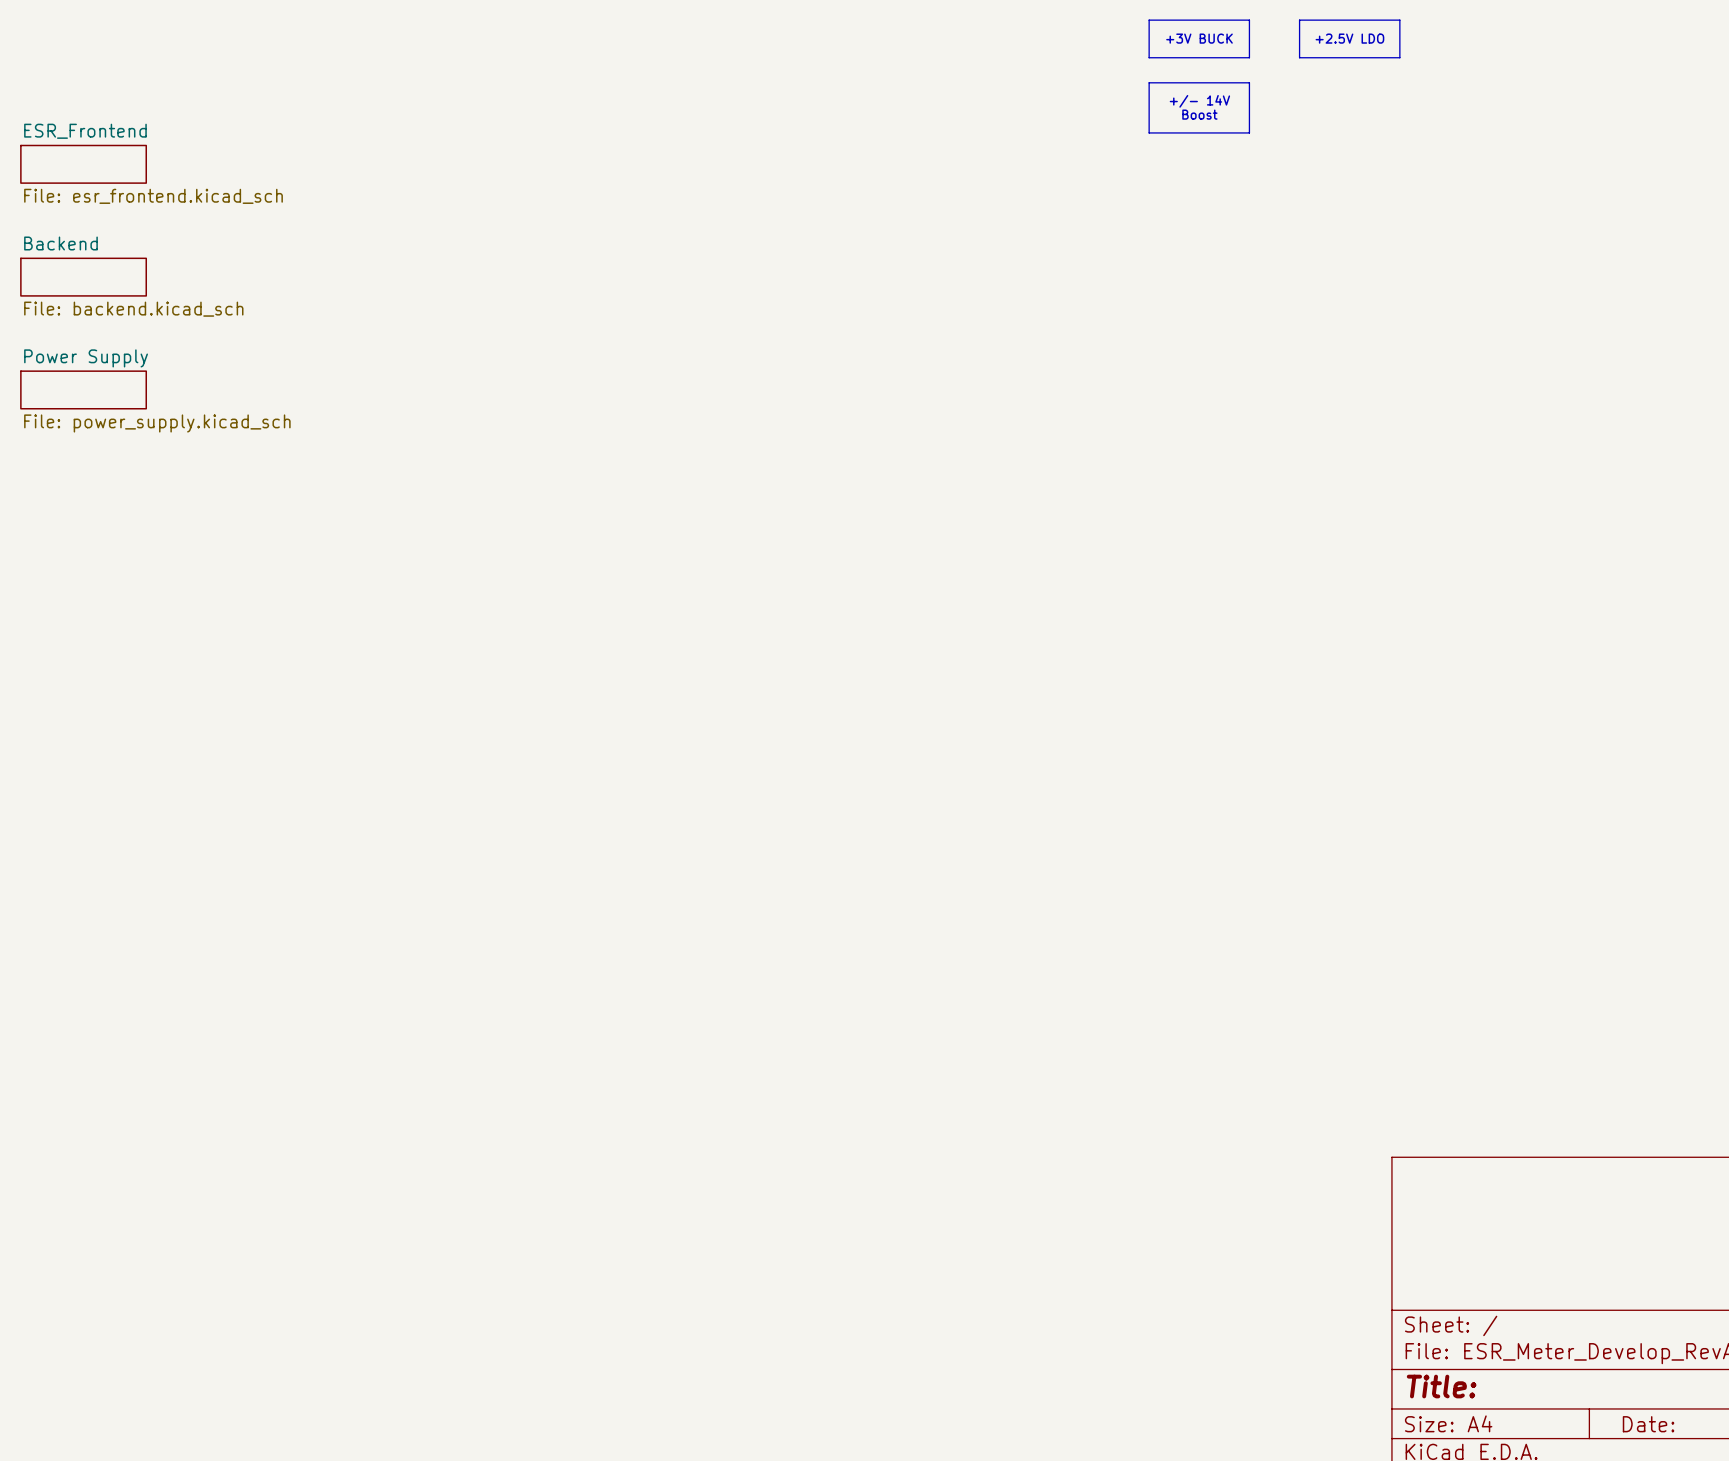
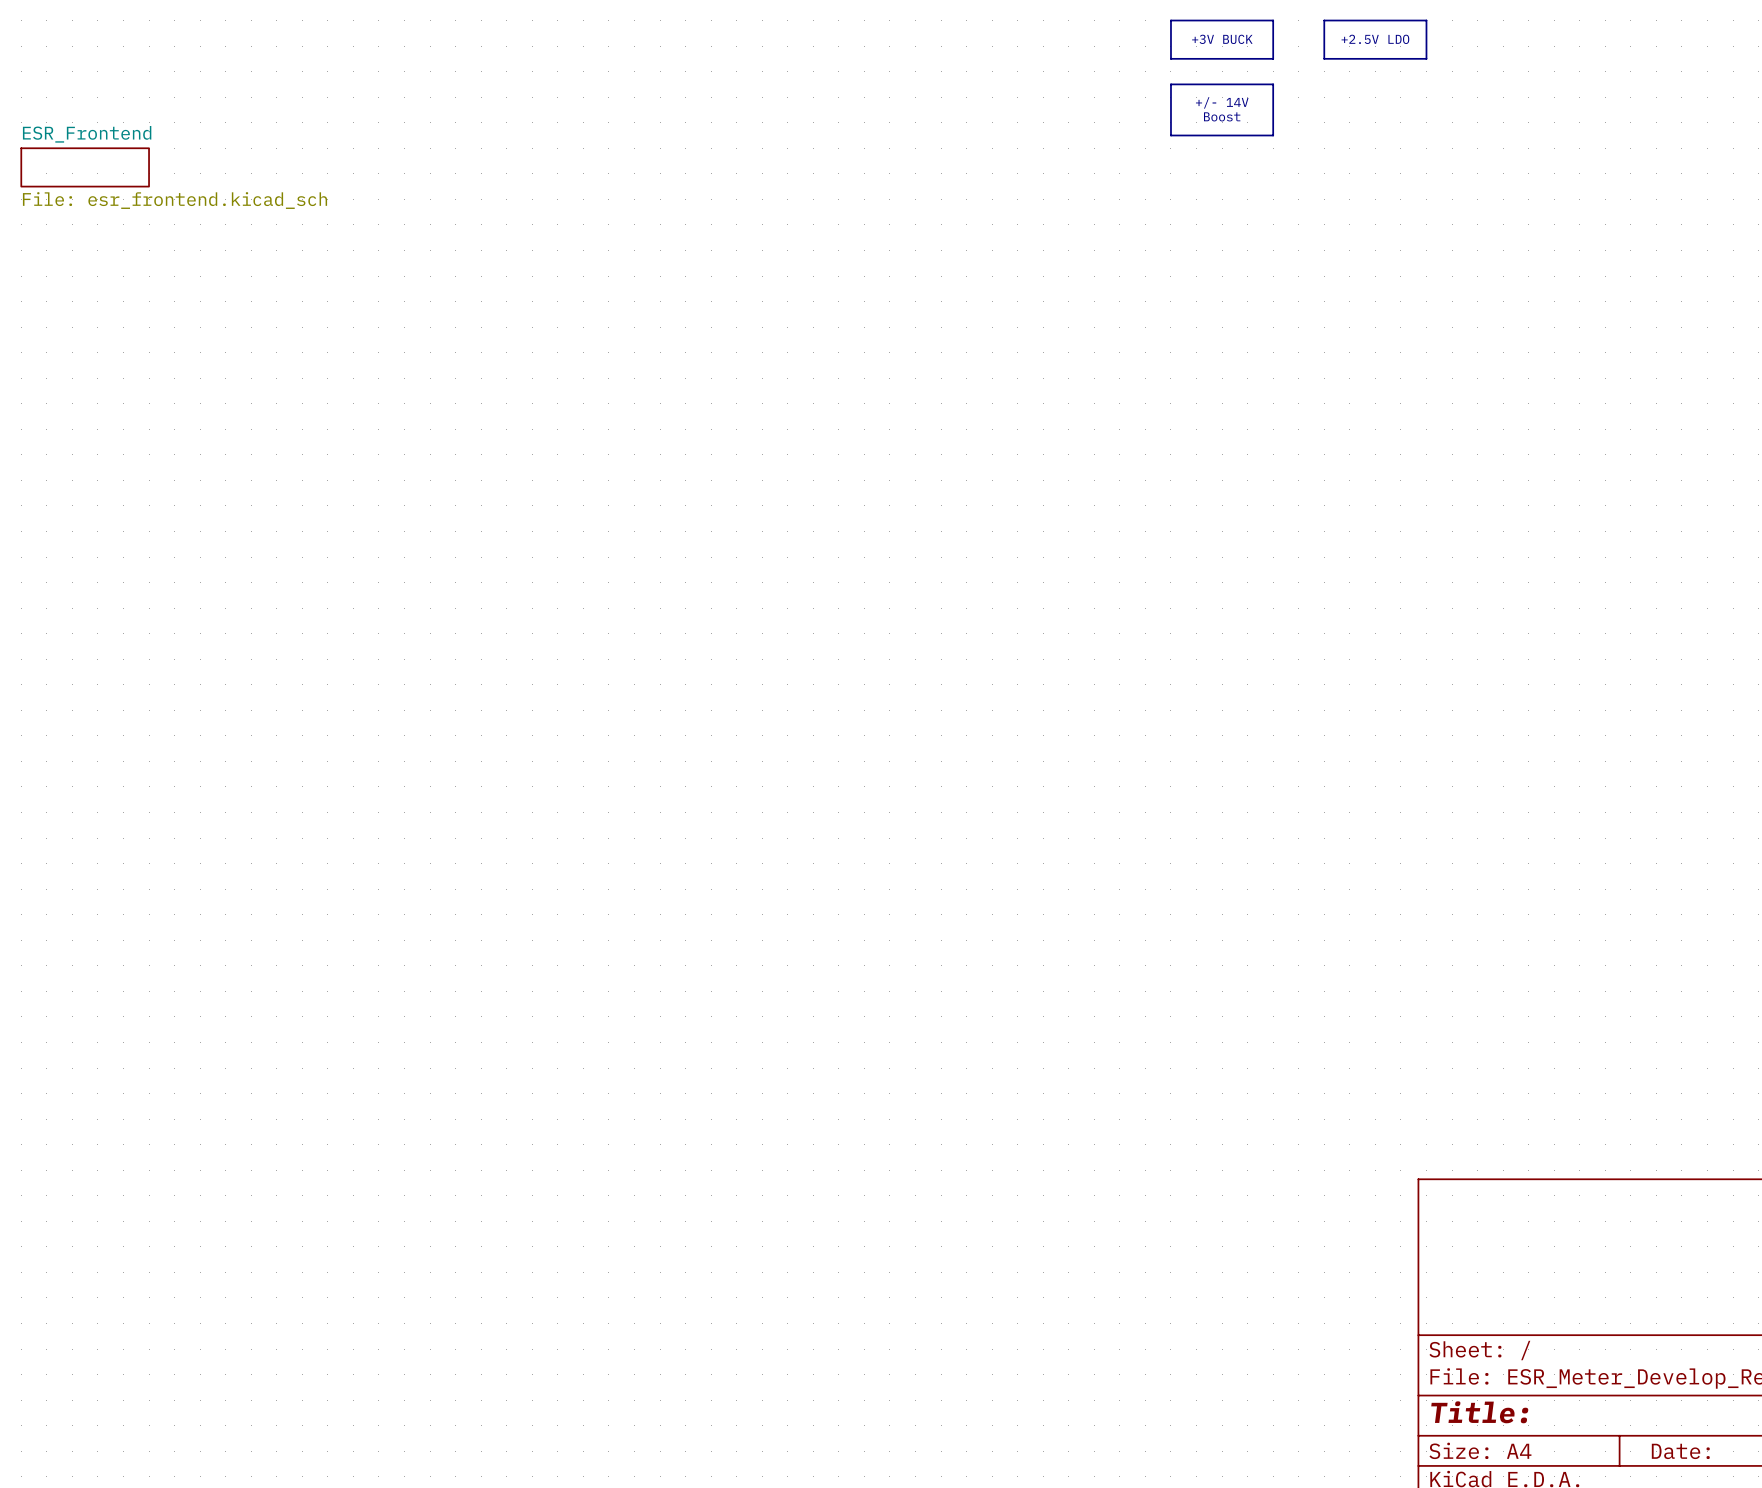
sheet Backend: File: backend.kicad_sch (83, 277) -> none
sheet Power Supply: File: power_supply.kicad_sch (83, 389) -> none

